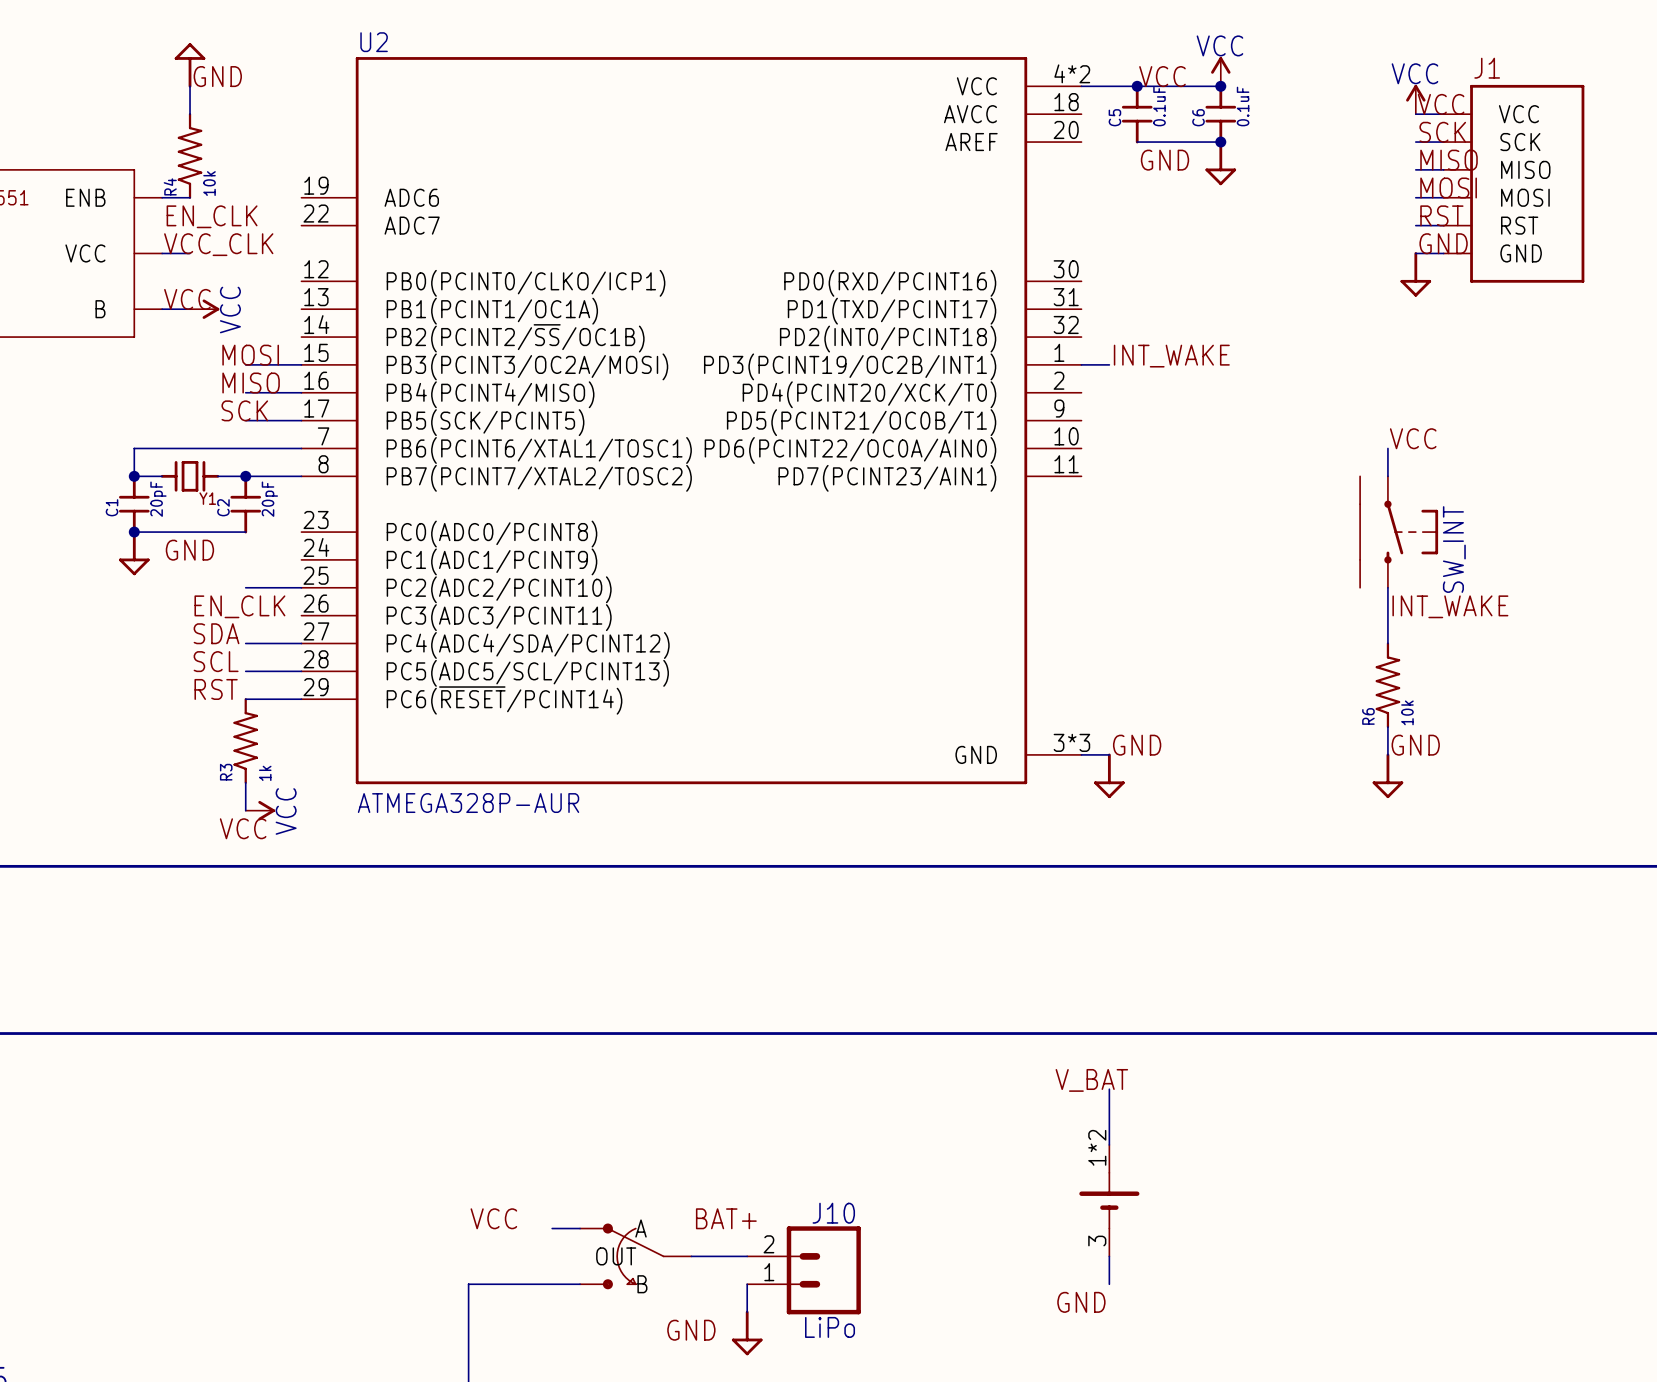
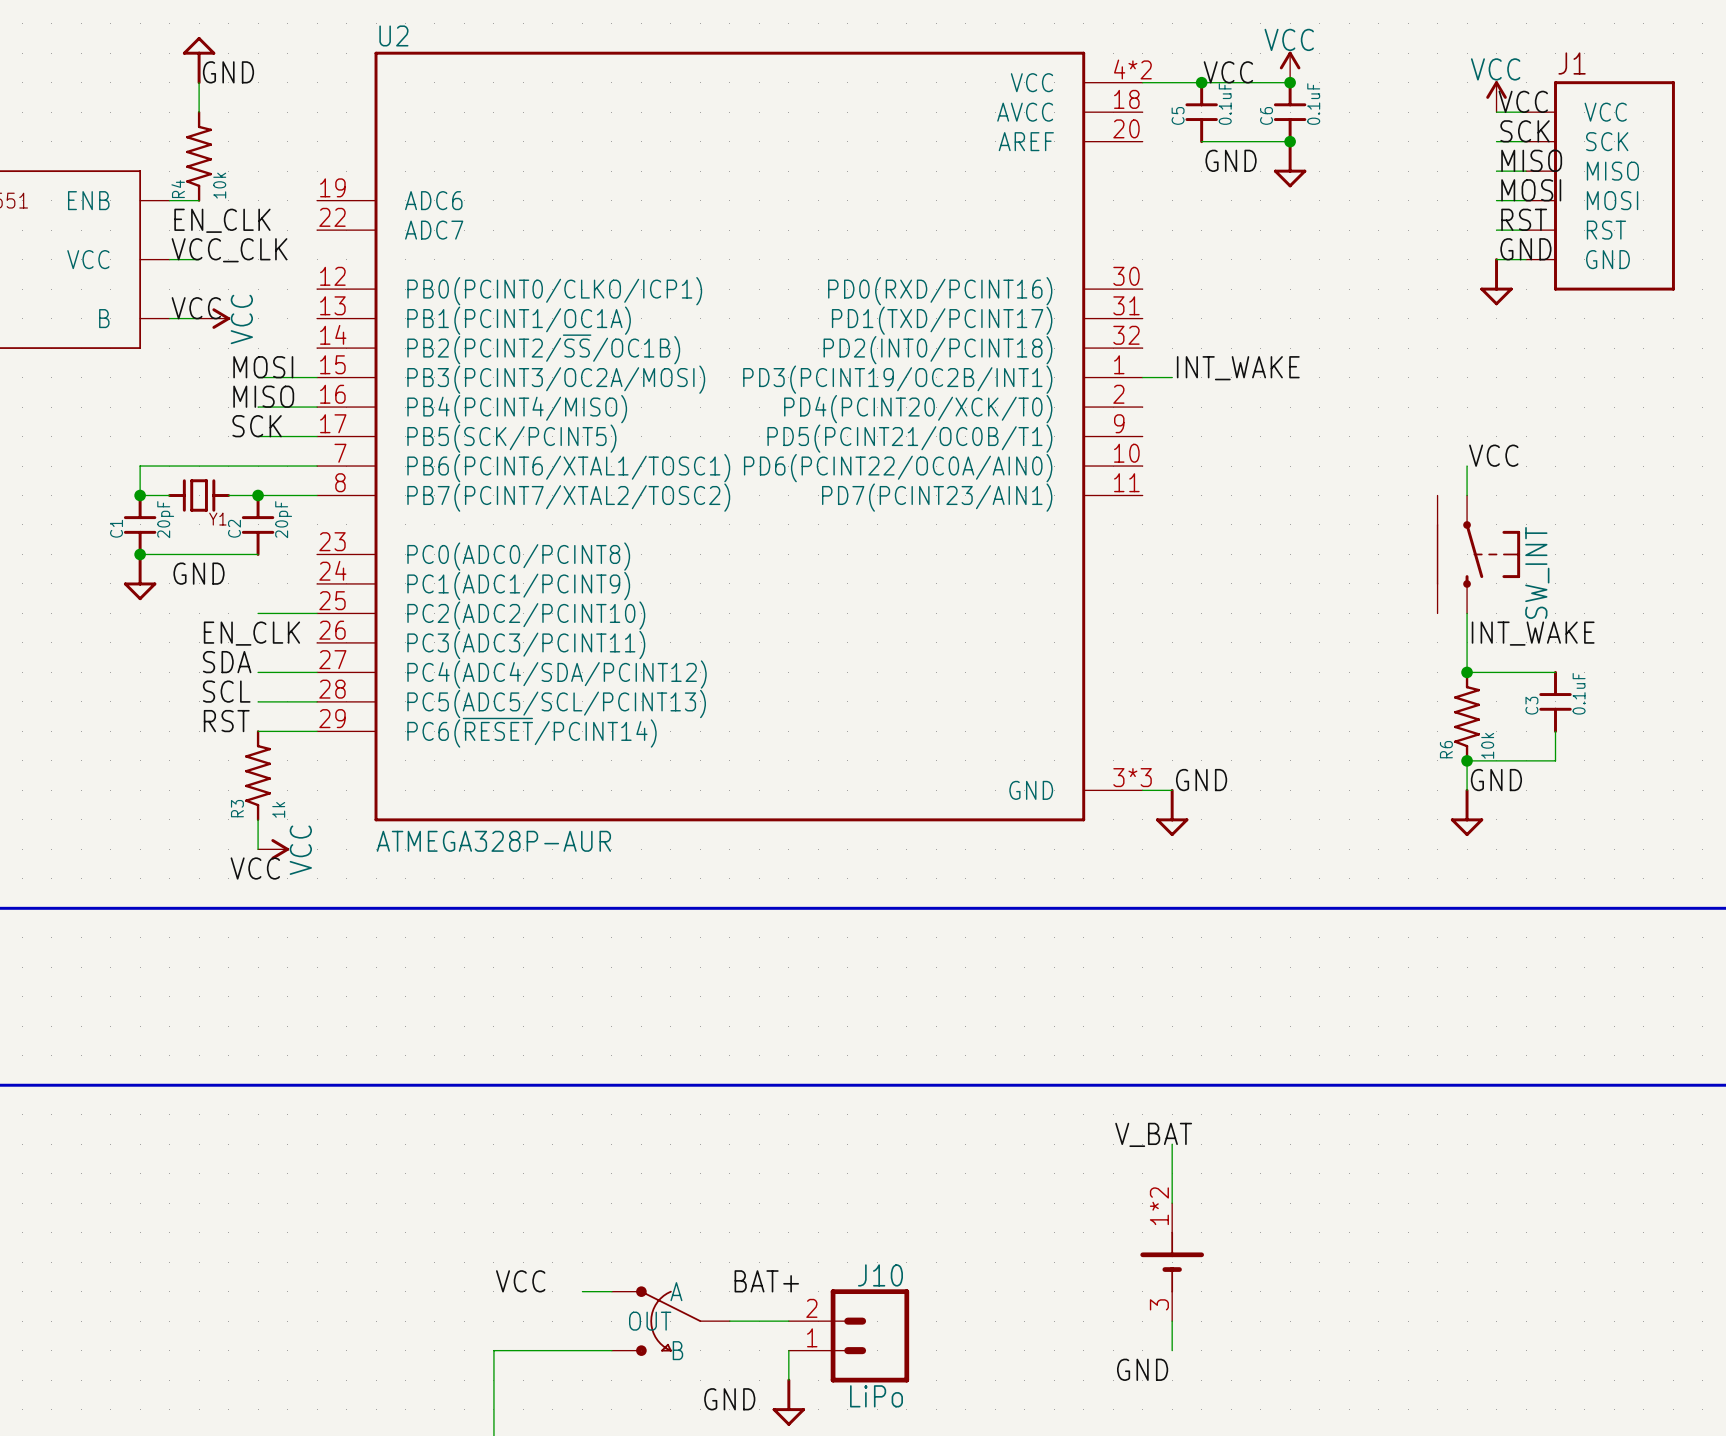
wire: none -> (1467, 672) (1555, 672)
junction: none -> (1467, 672)
C3: none -> 0.1uF (1555, 701)
wire: none -> (1555, 731) (1555, 760) (1467, 760)
junction: none -> (1467, 760)

